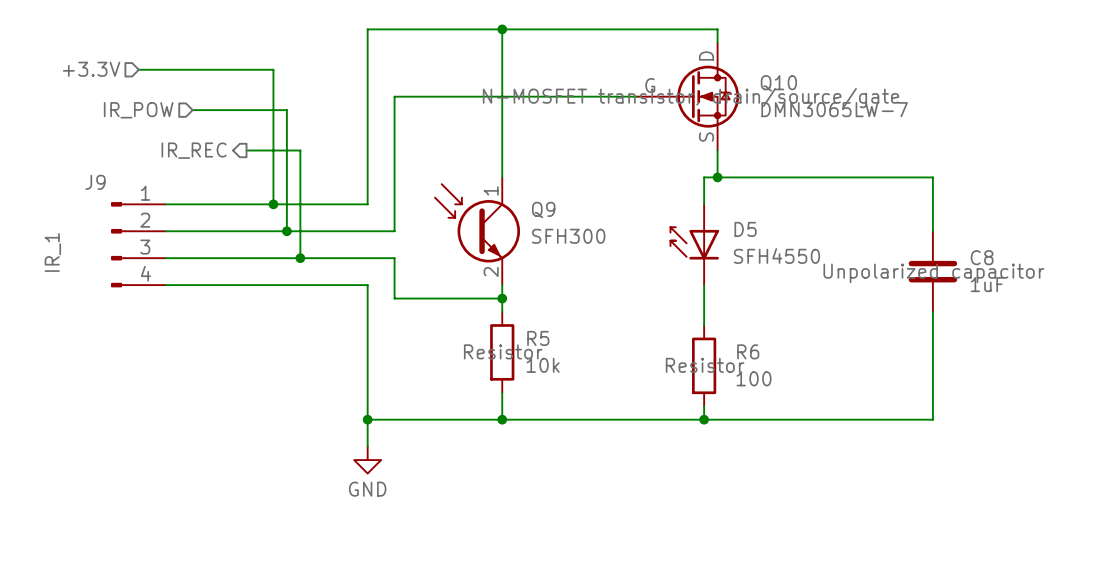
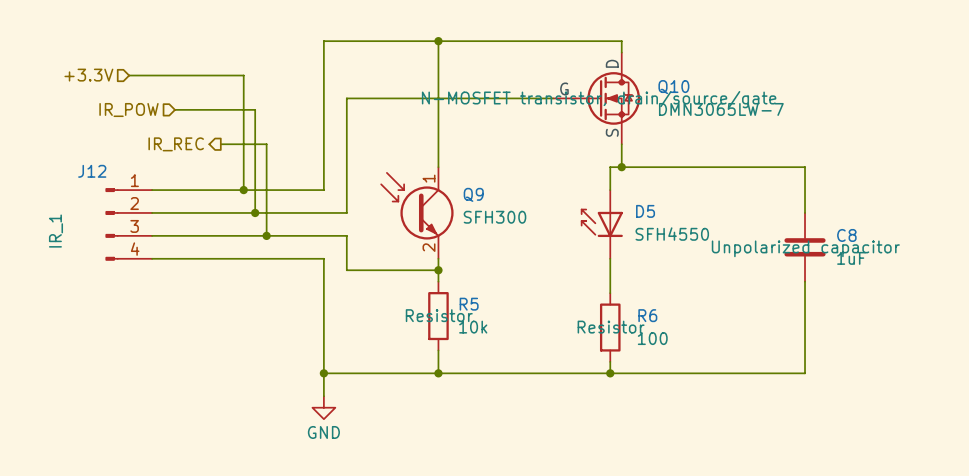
J9 name: J9 (95, 182) -> J12 (92, 171)

